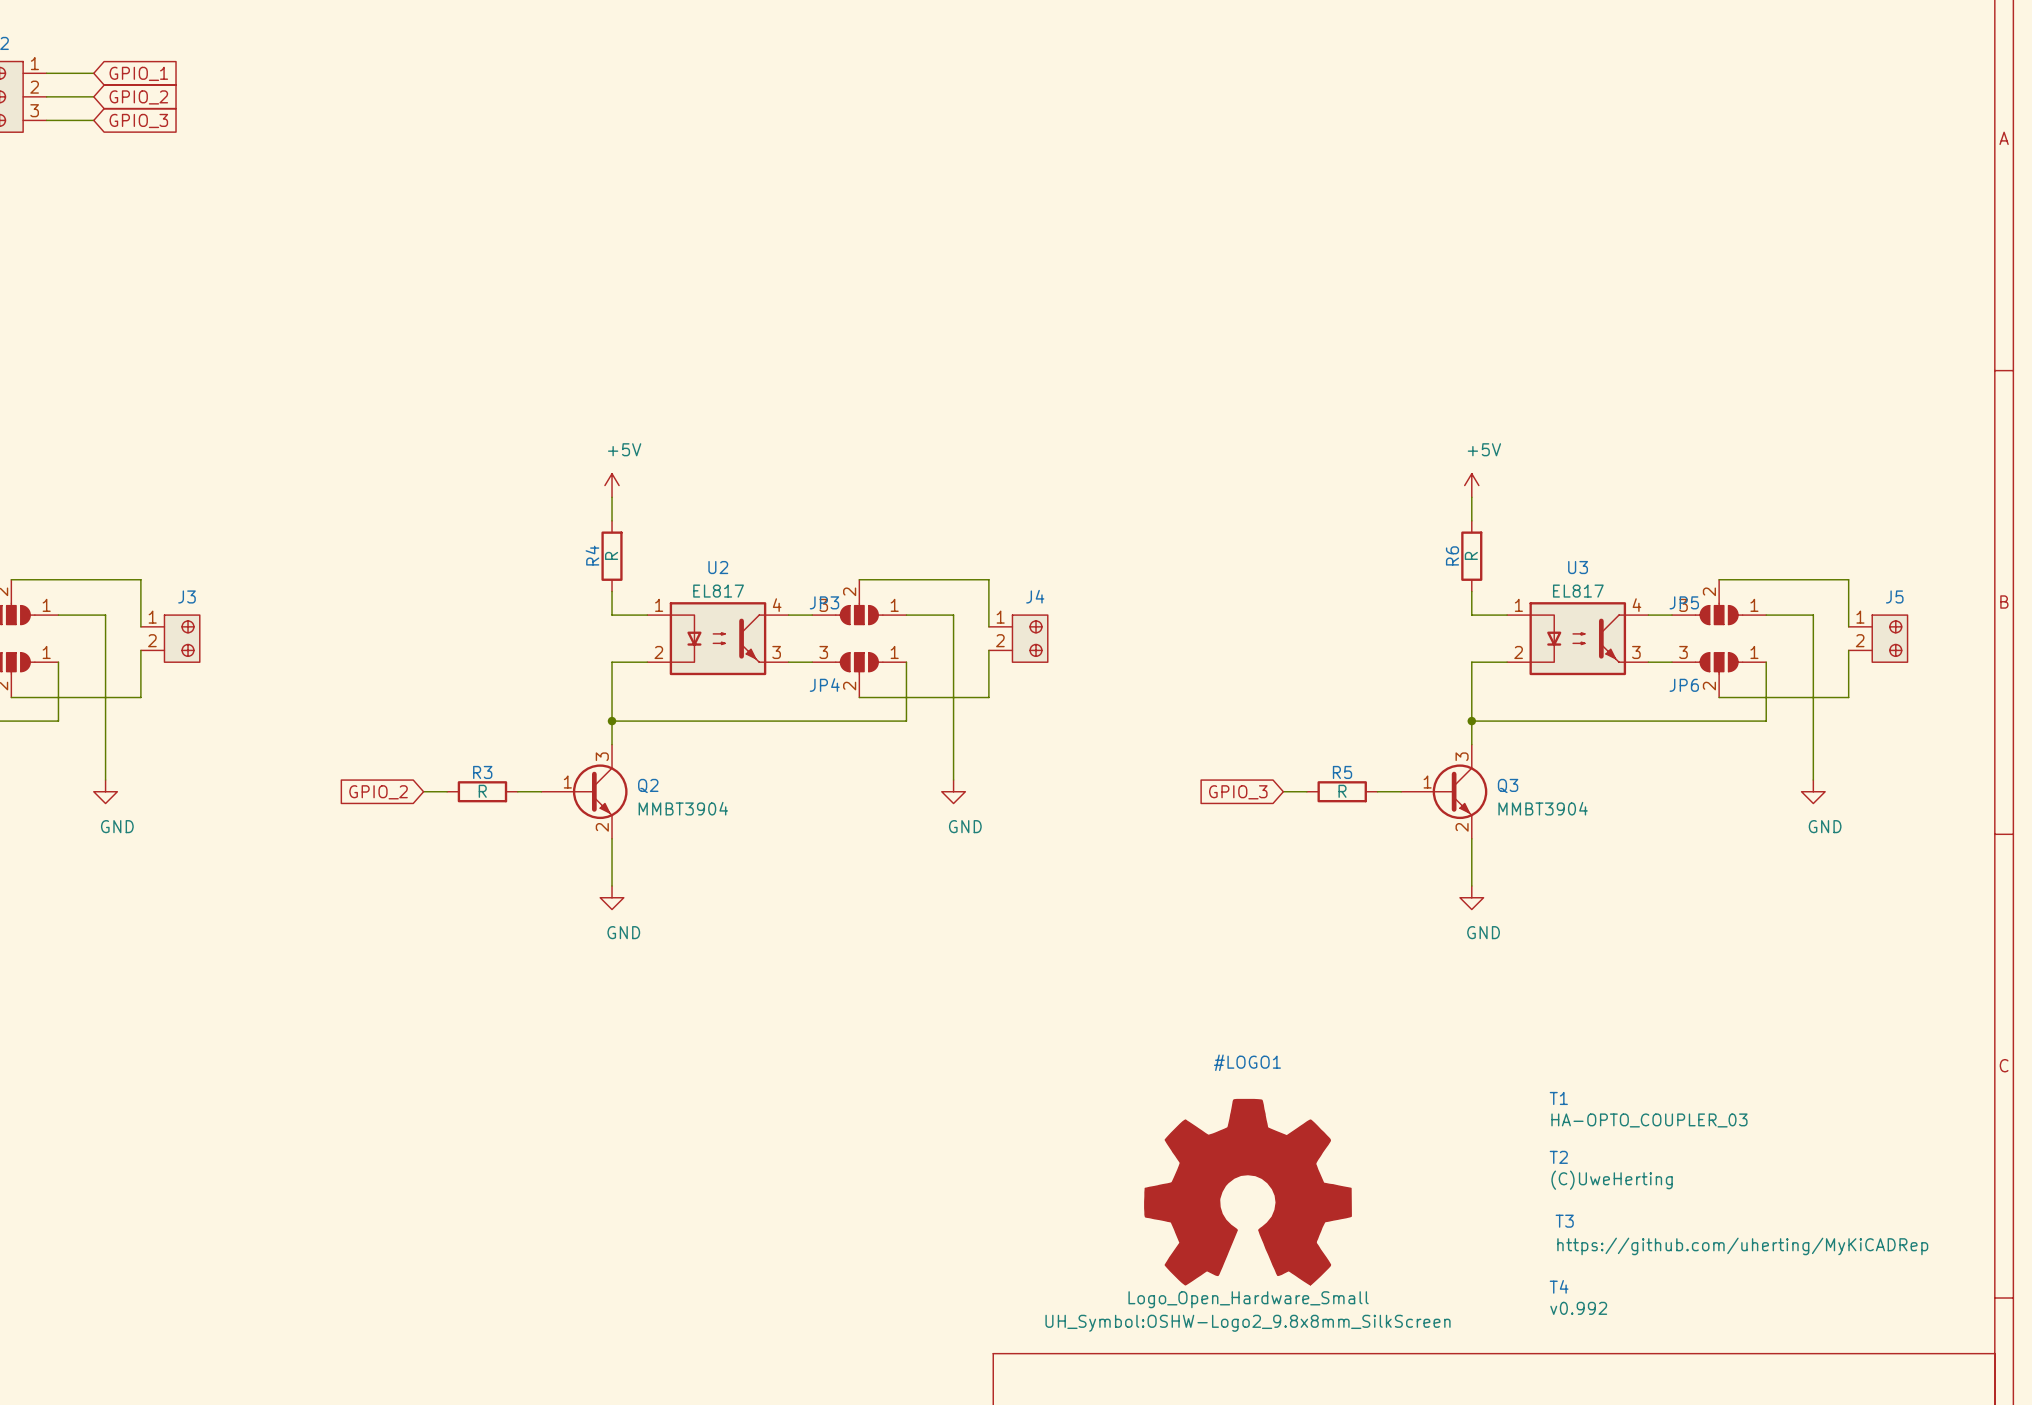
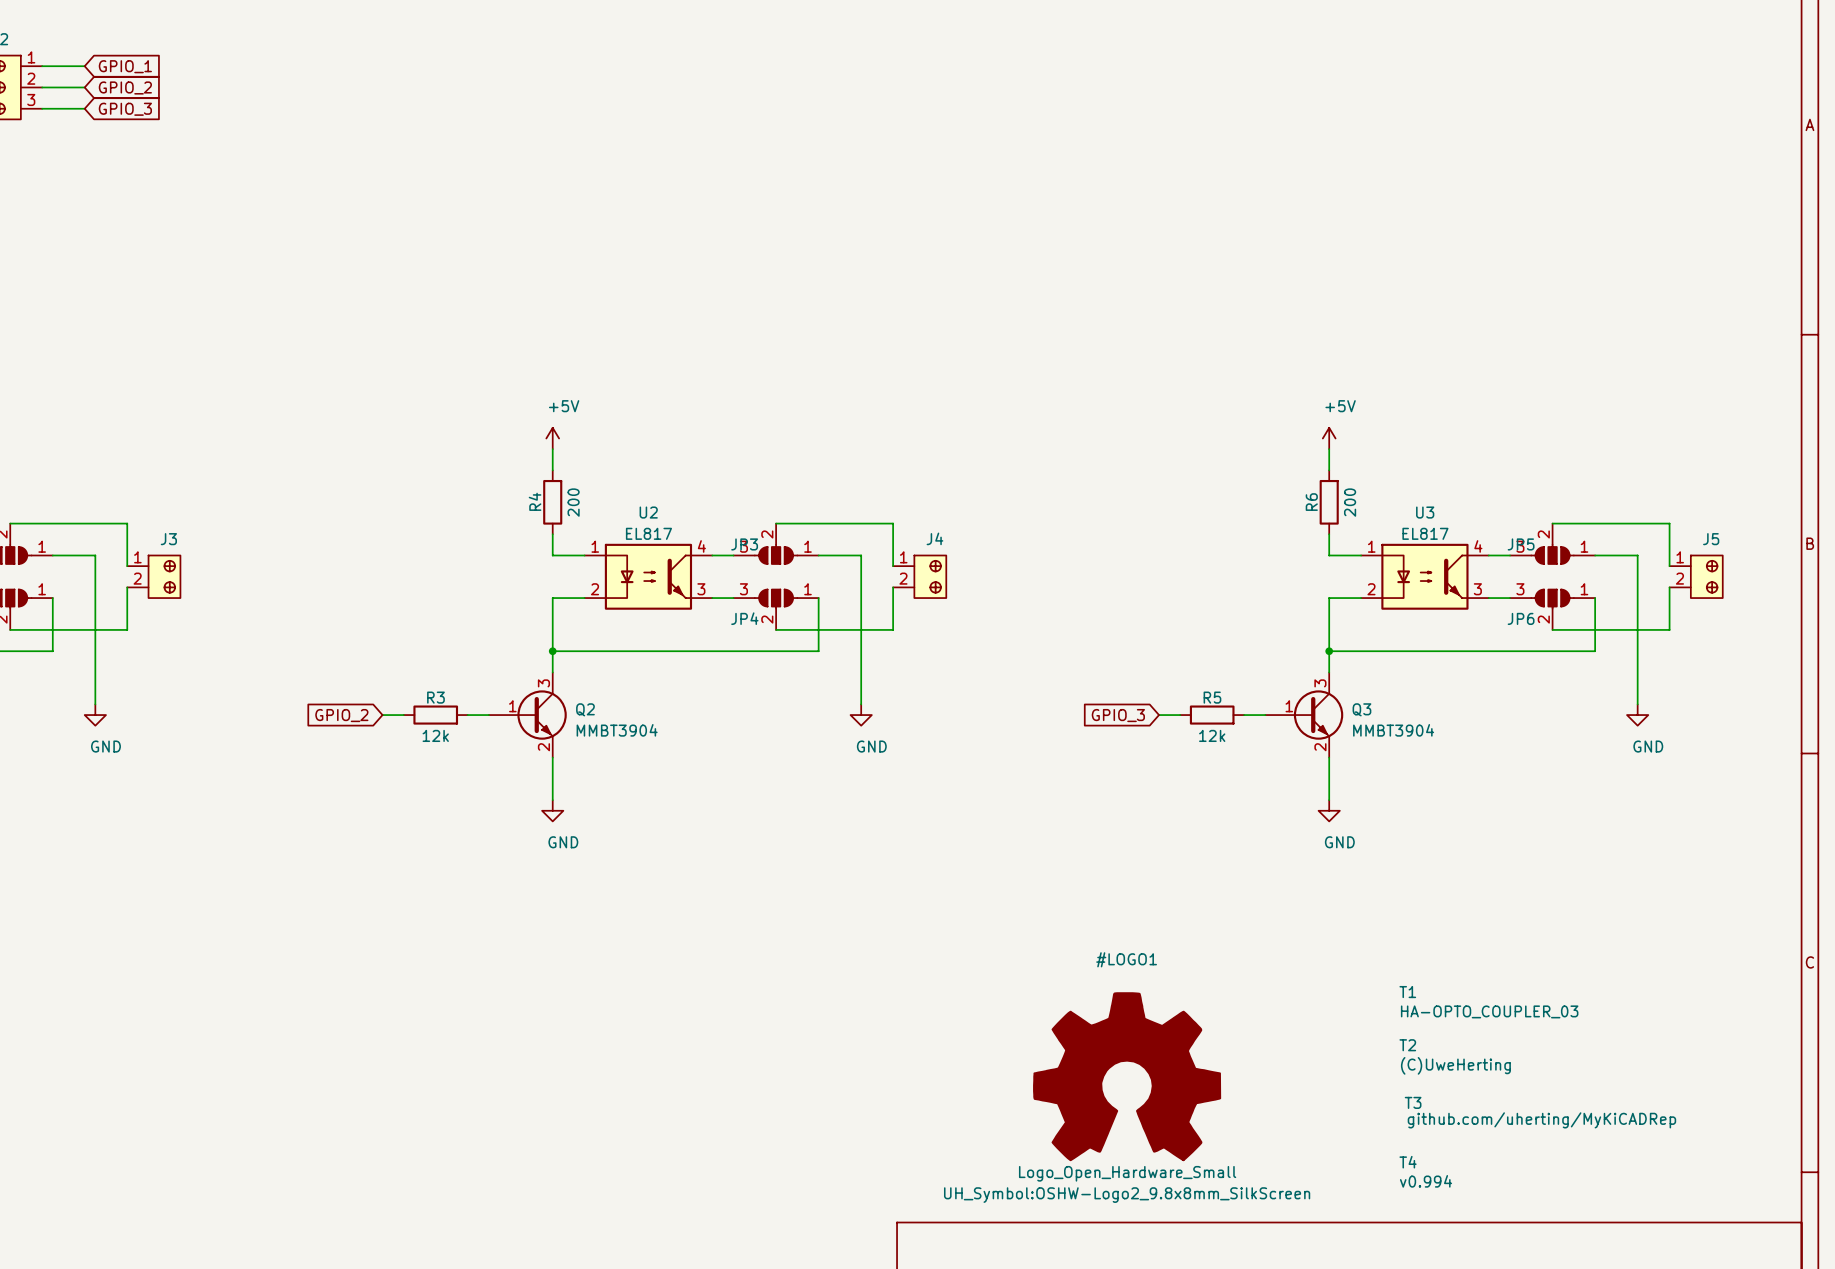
R4 value: R (611, 555) -> 200 (573, 502)
R6 value: R (1471, 555) -> 200 (1350, 502)
R3 value: R (482, 791) -> 12k (435, 735)
R5 value: R (1342, 791) -> 12k (1212, 735)
T3 position: (1741, 1234) -> (1540, 1112)
T3 value: none -> github.com/uherting/MyKiCADRep (1541, 1120)
T3 text: https://github.com/uherting/MyKiCADRep (1742, 1246) -> none
T4 value: v0.992 (1578, 1308) -> v0.994 (1426, 1181)

